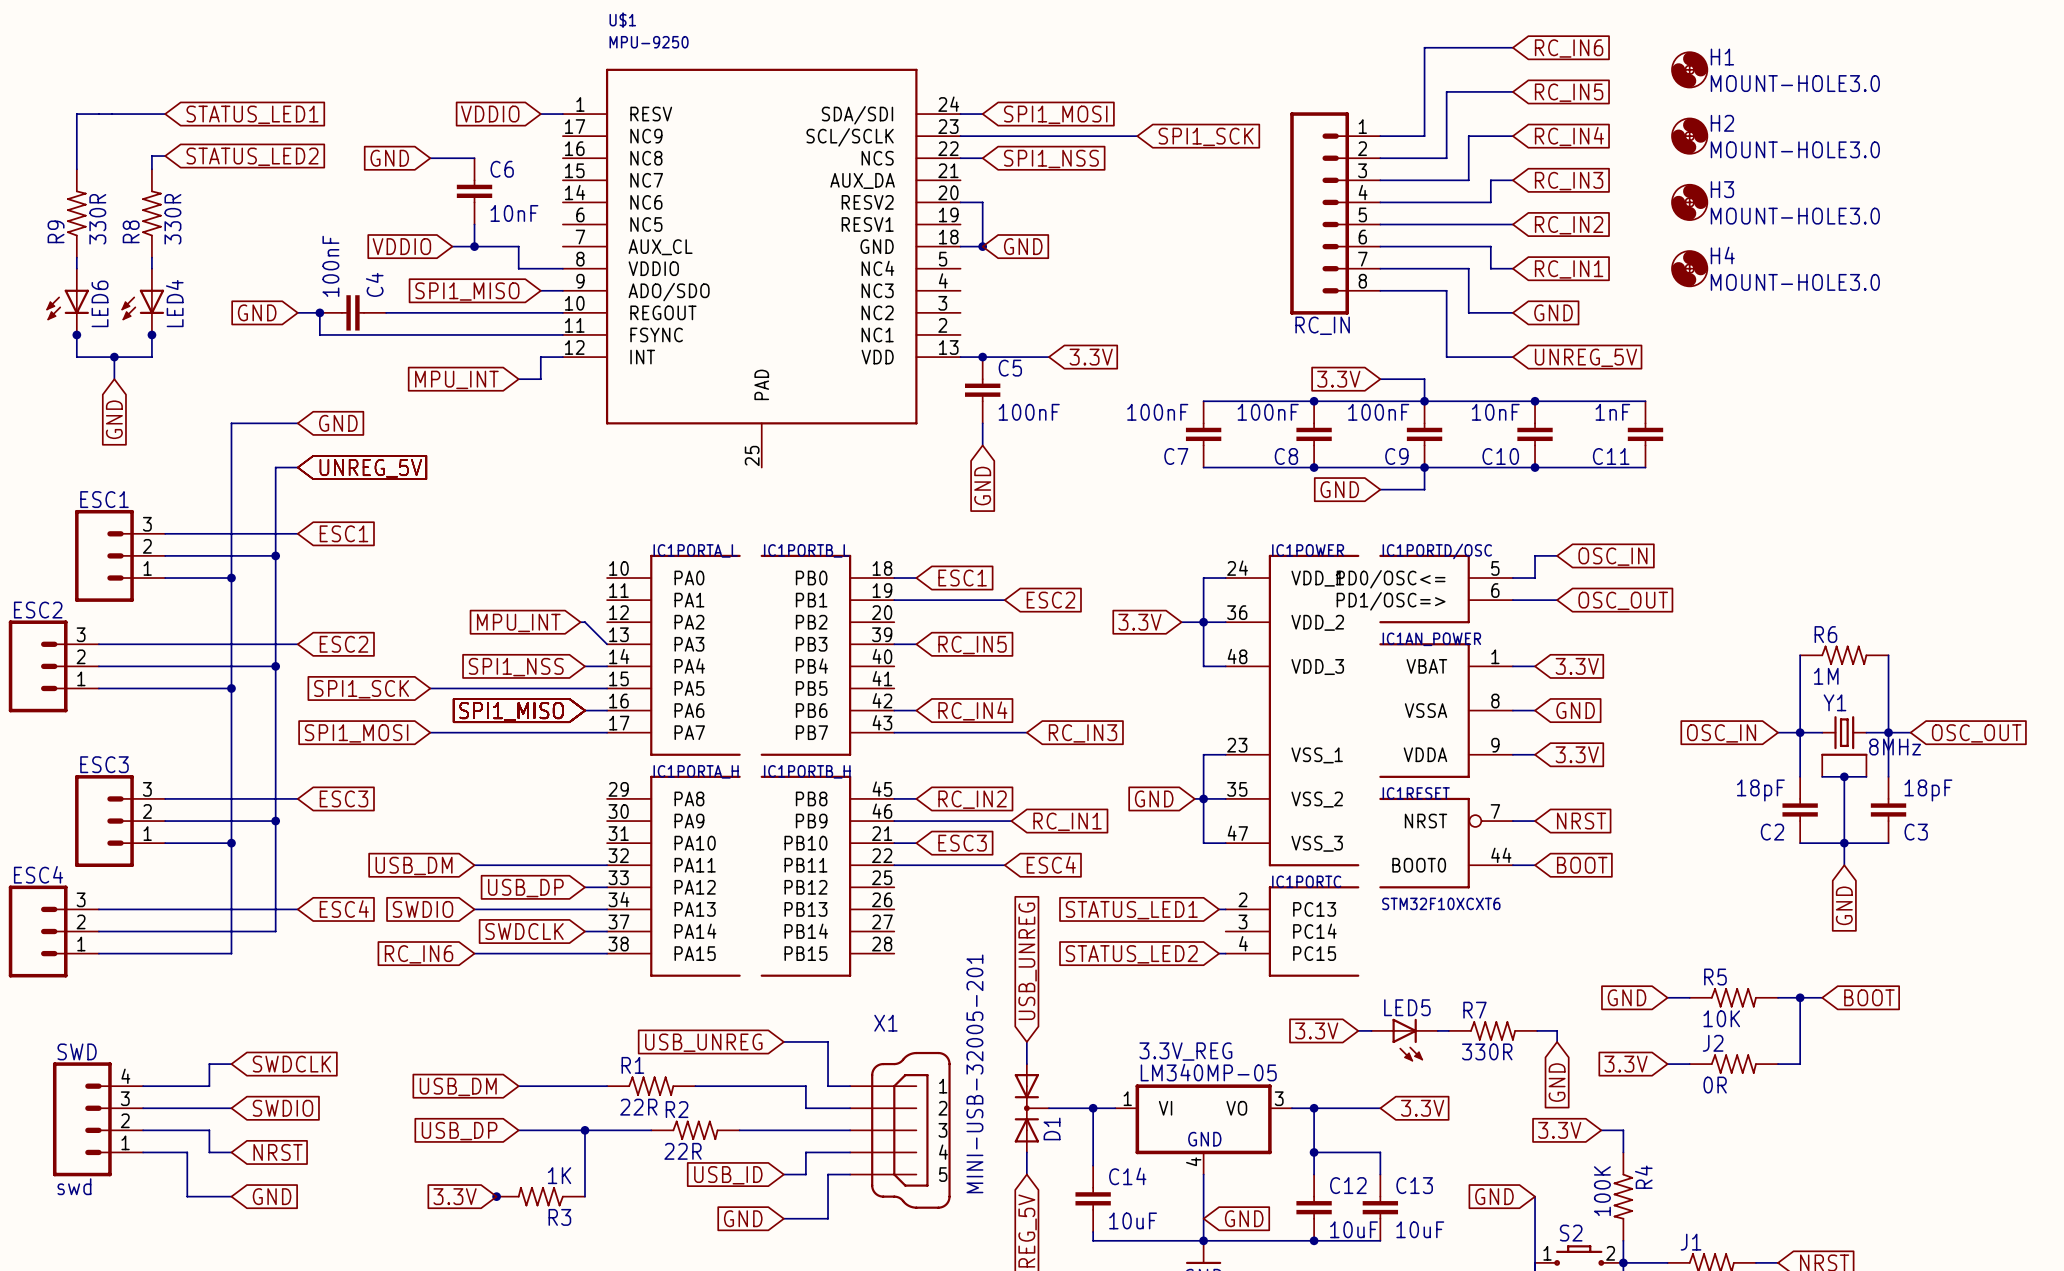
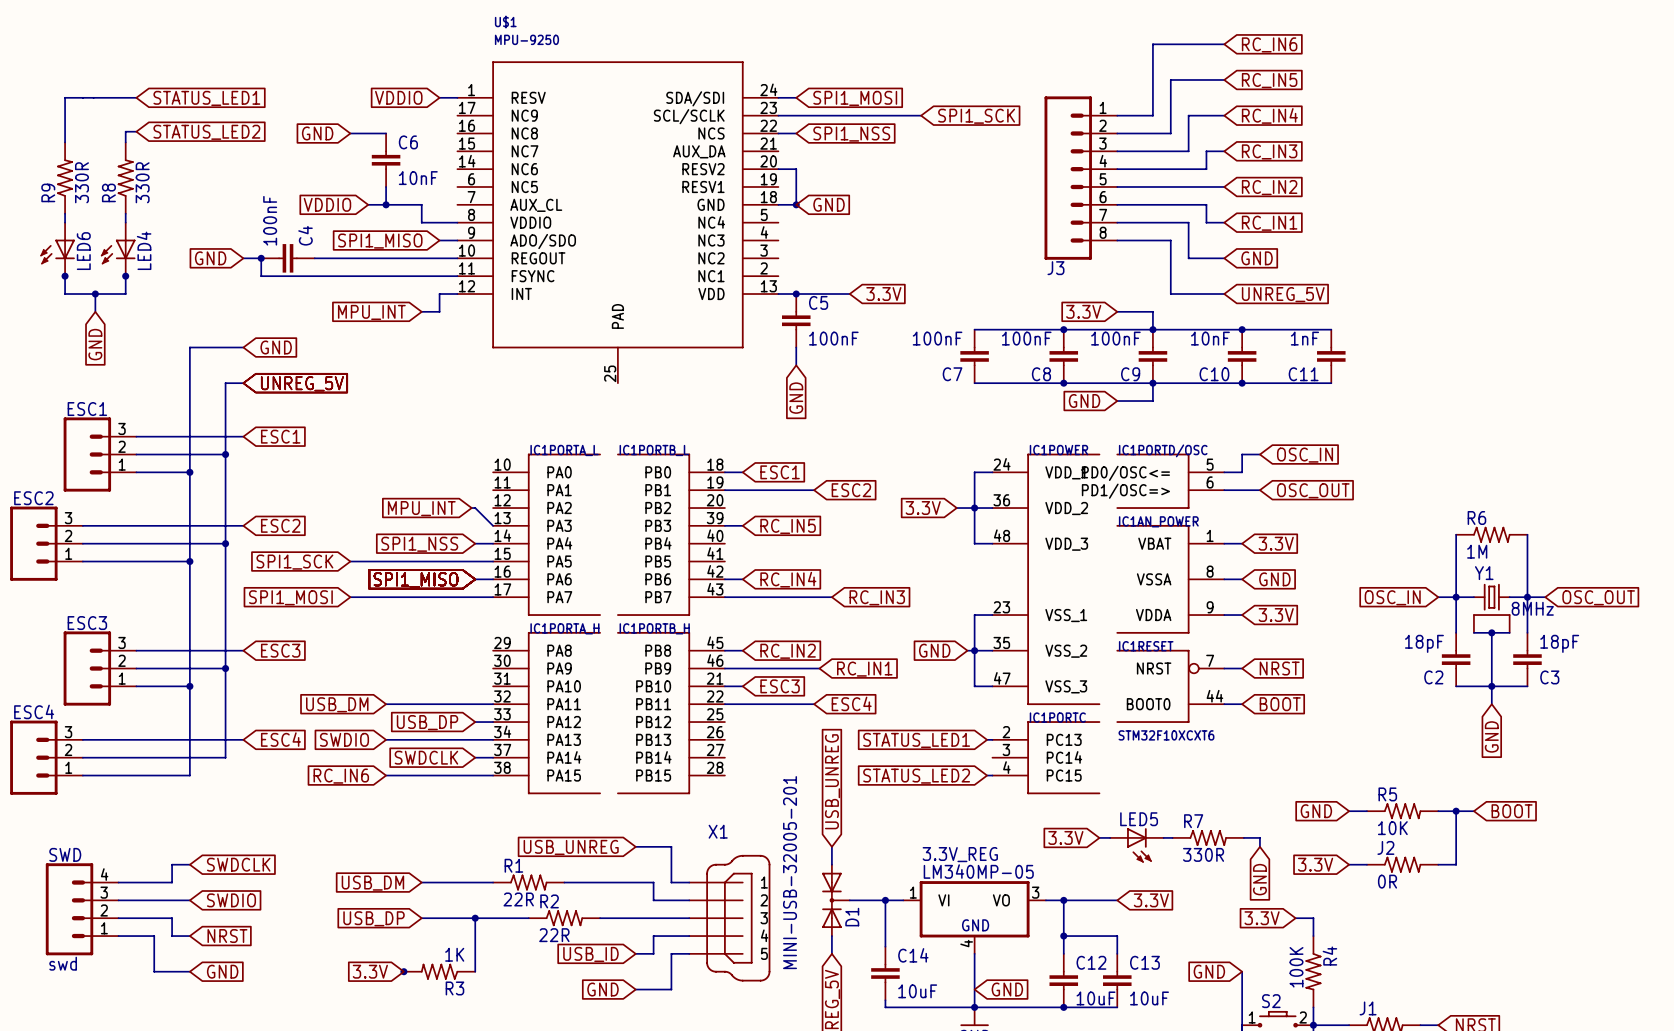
H1: MOUNT-HOLE3.0 (1689, 69) -> none
H2: MOUNT-HOLE3.0 (1689, 136) -> none
H3: MOUNT-HOLE3.0 (1689, 202) -> none
H4: MOUNT-HOLE3.0 (1689, 268) -> none
RC_IN name: RC_IN (1322, 325) -> J3 (1055, 268)

